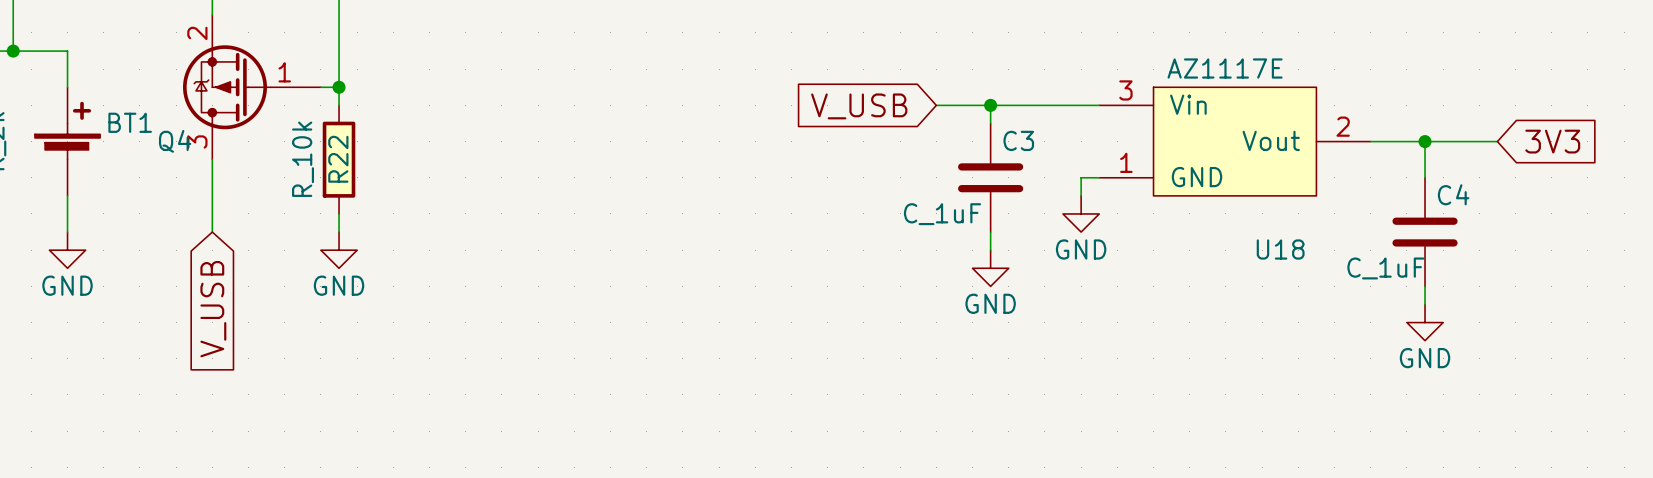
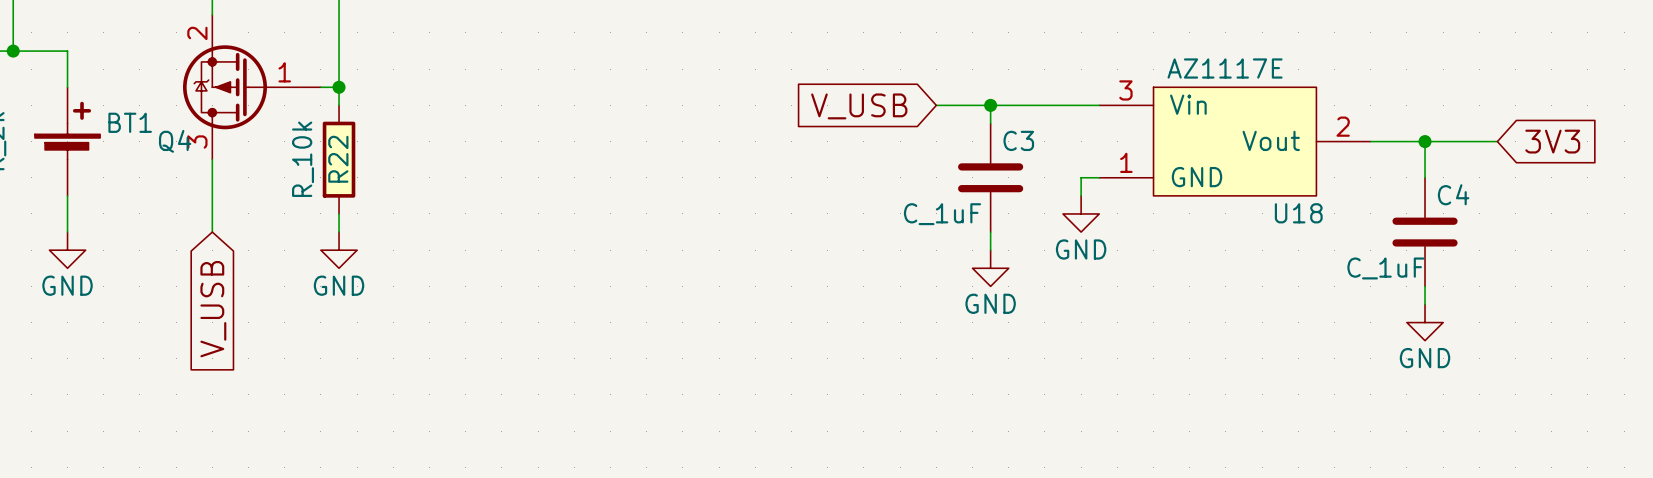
U18 name position: U18 (1280, 249) -> U18 (1298, 213)

